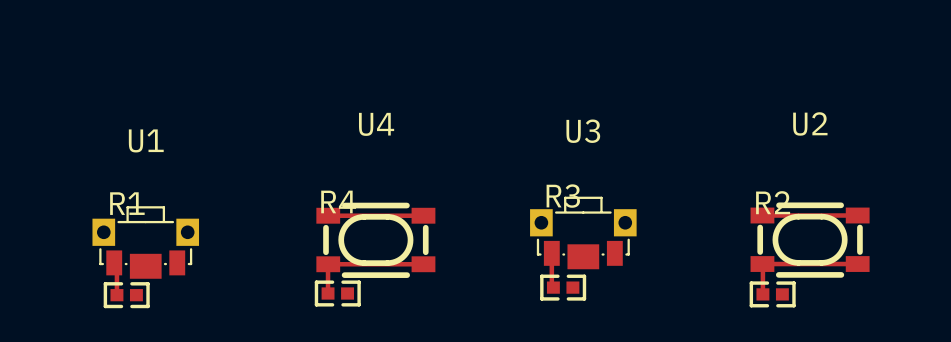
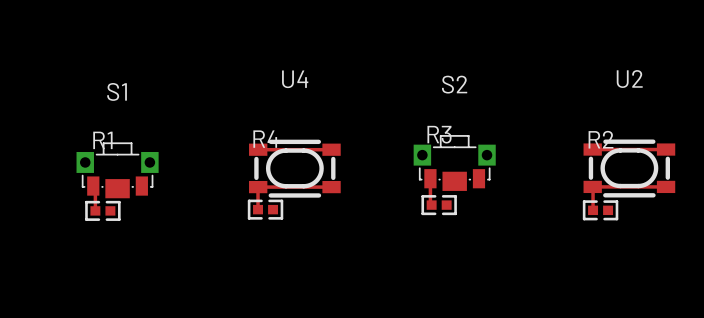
U3 name: U3 (583, 131) -> S2 (454, 84)
U1 name: U1 (146, 140) -> S1 (117, 91)

